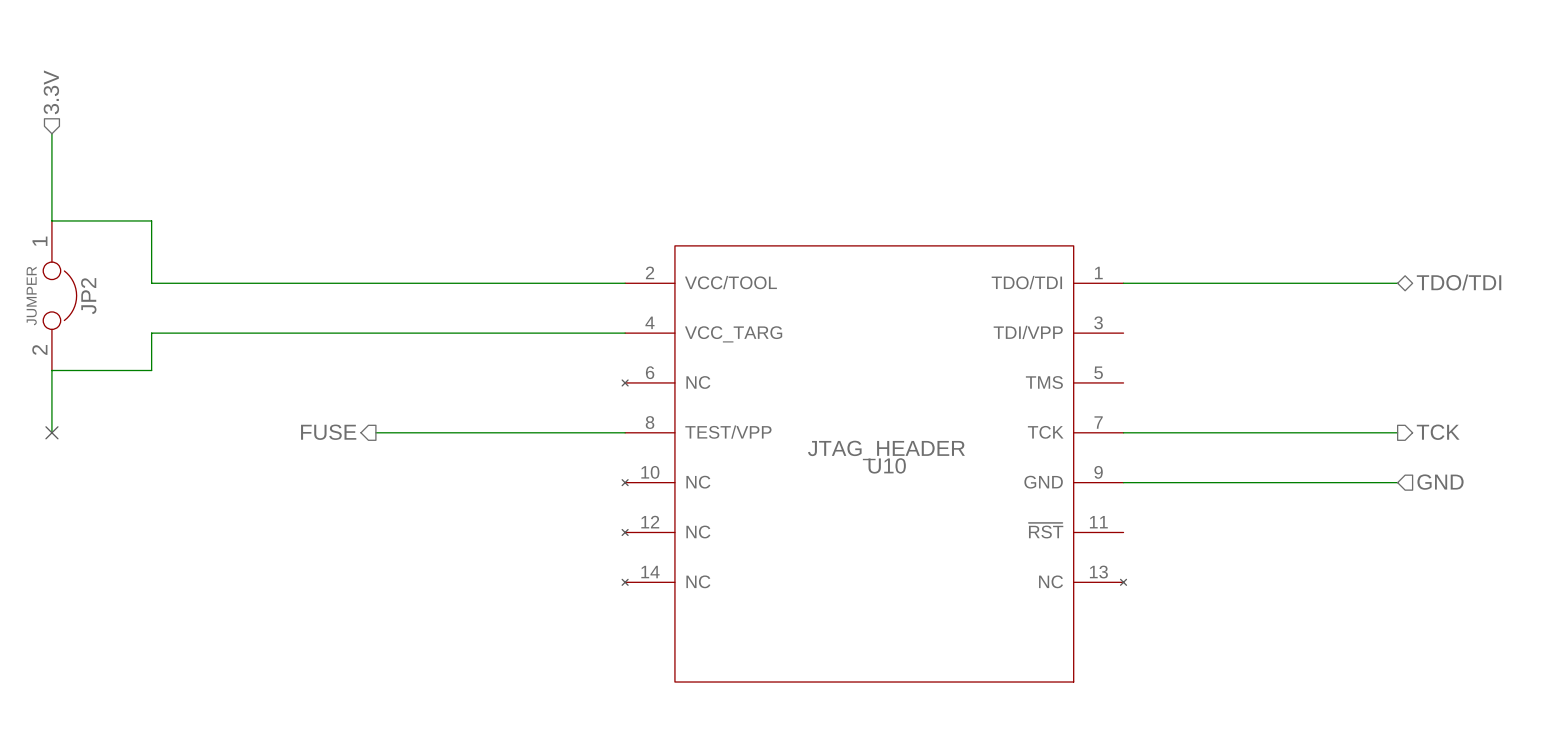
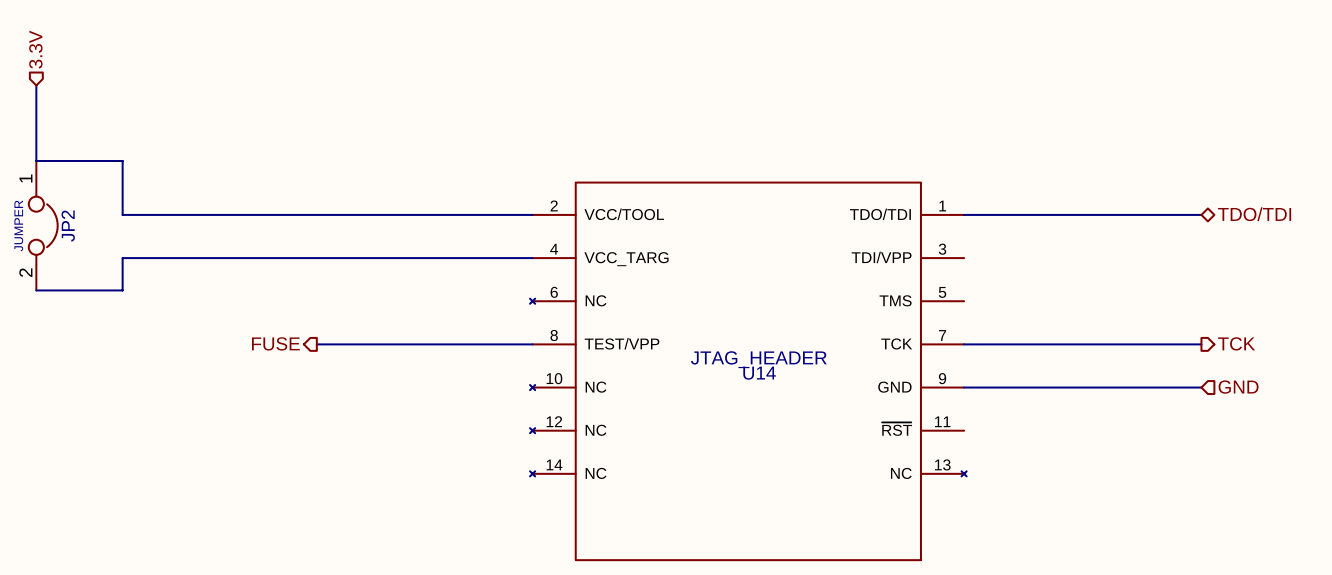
wire: (51, 370) (51, 432) -> none
no-connect mark: (51, 432) -> none
U10 name: U10 (887, 465) -> U14 (759, 373)

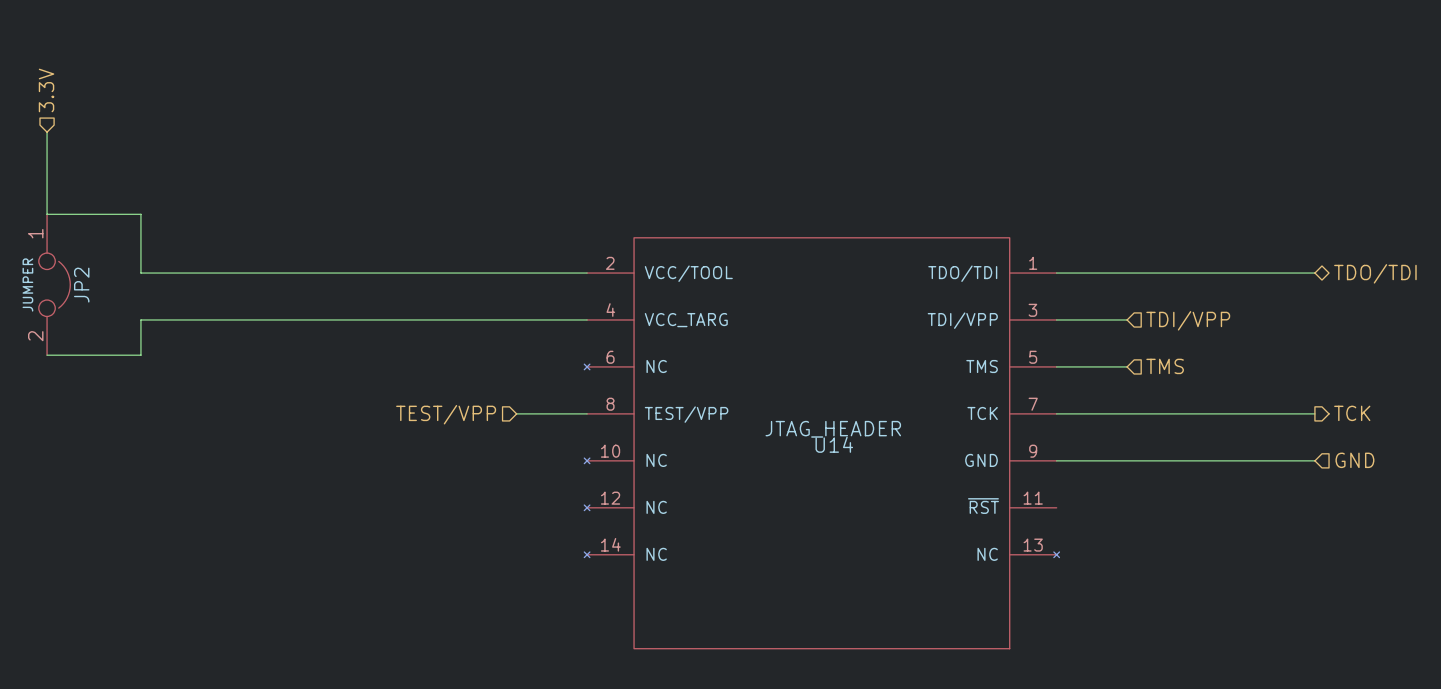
hierarchical label: none -> TDI/VPP (1188, 320)
wire: none -> (1056, 319) (1127, 319)
hierarchical label: none -> TMS (1165, 366)
wire: none -> (1056, 366) (1127, 366)
hierarchical label: FUSE (275, 343) -> none
hierarchical label: none -> TEST/VPP (446, 414)
wire: (316, 344) (467, 344) -> none

